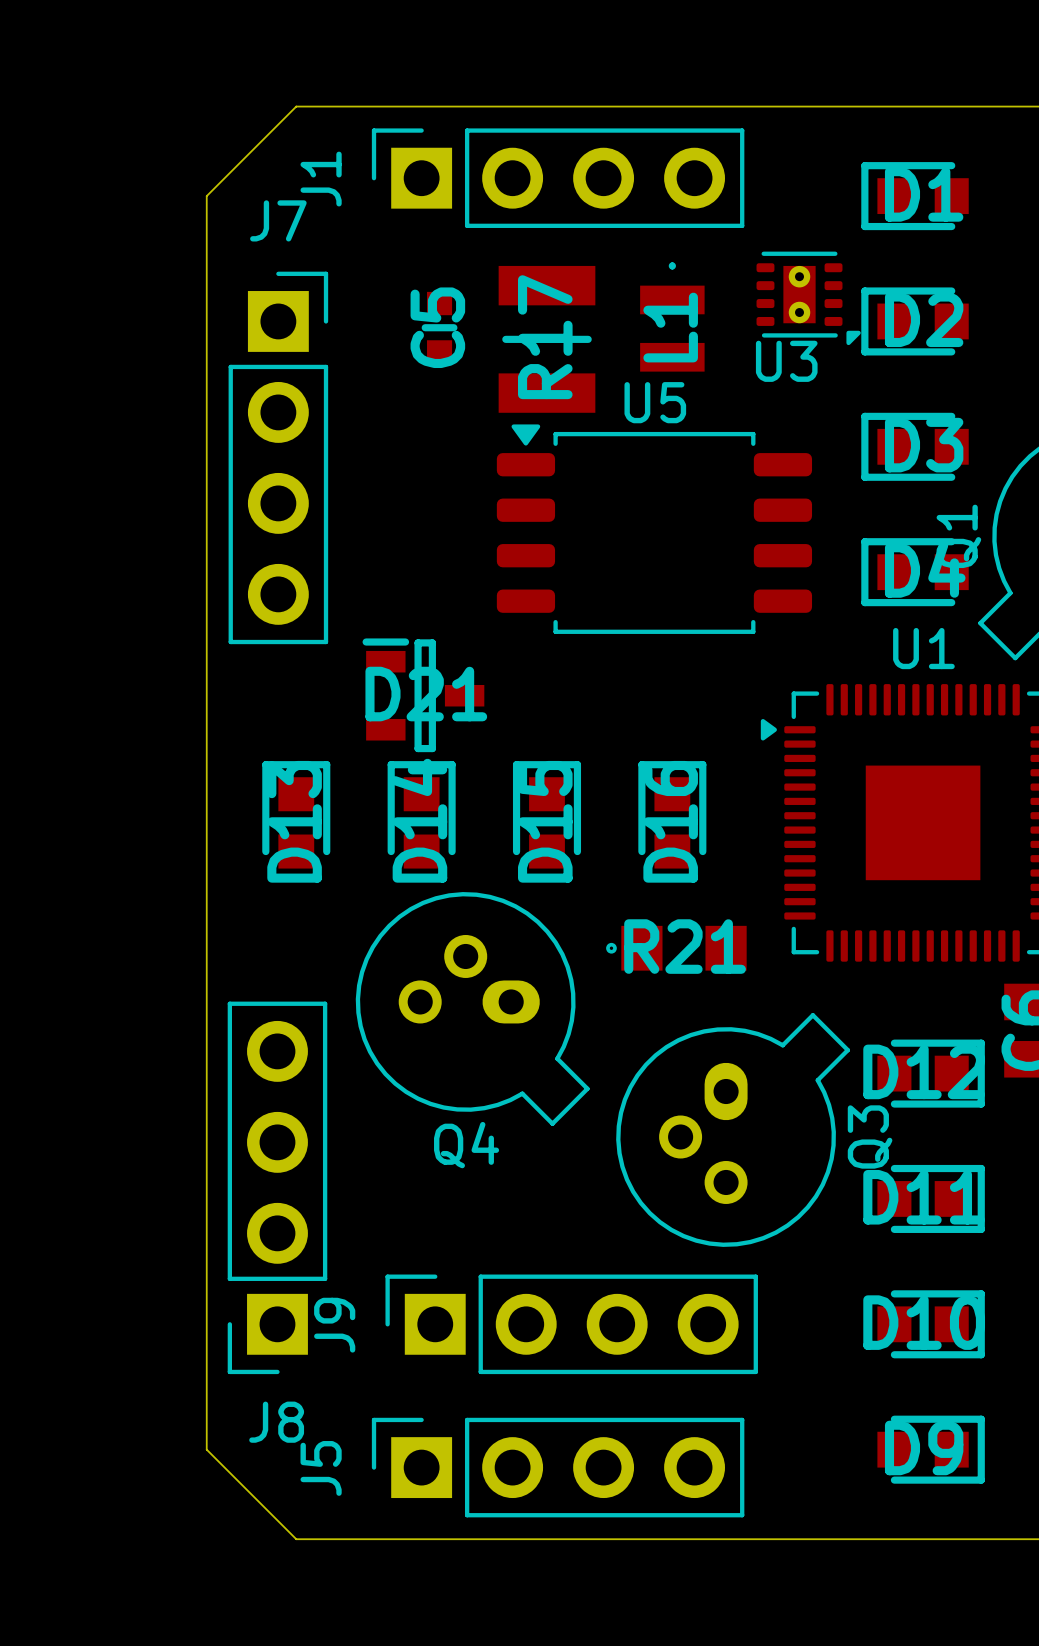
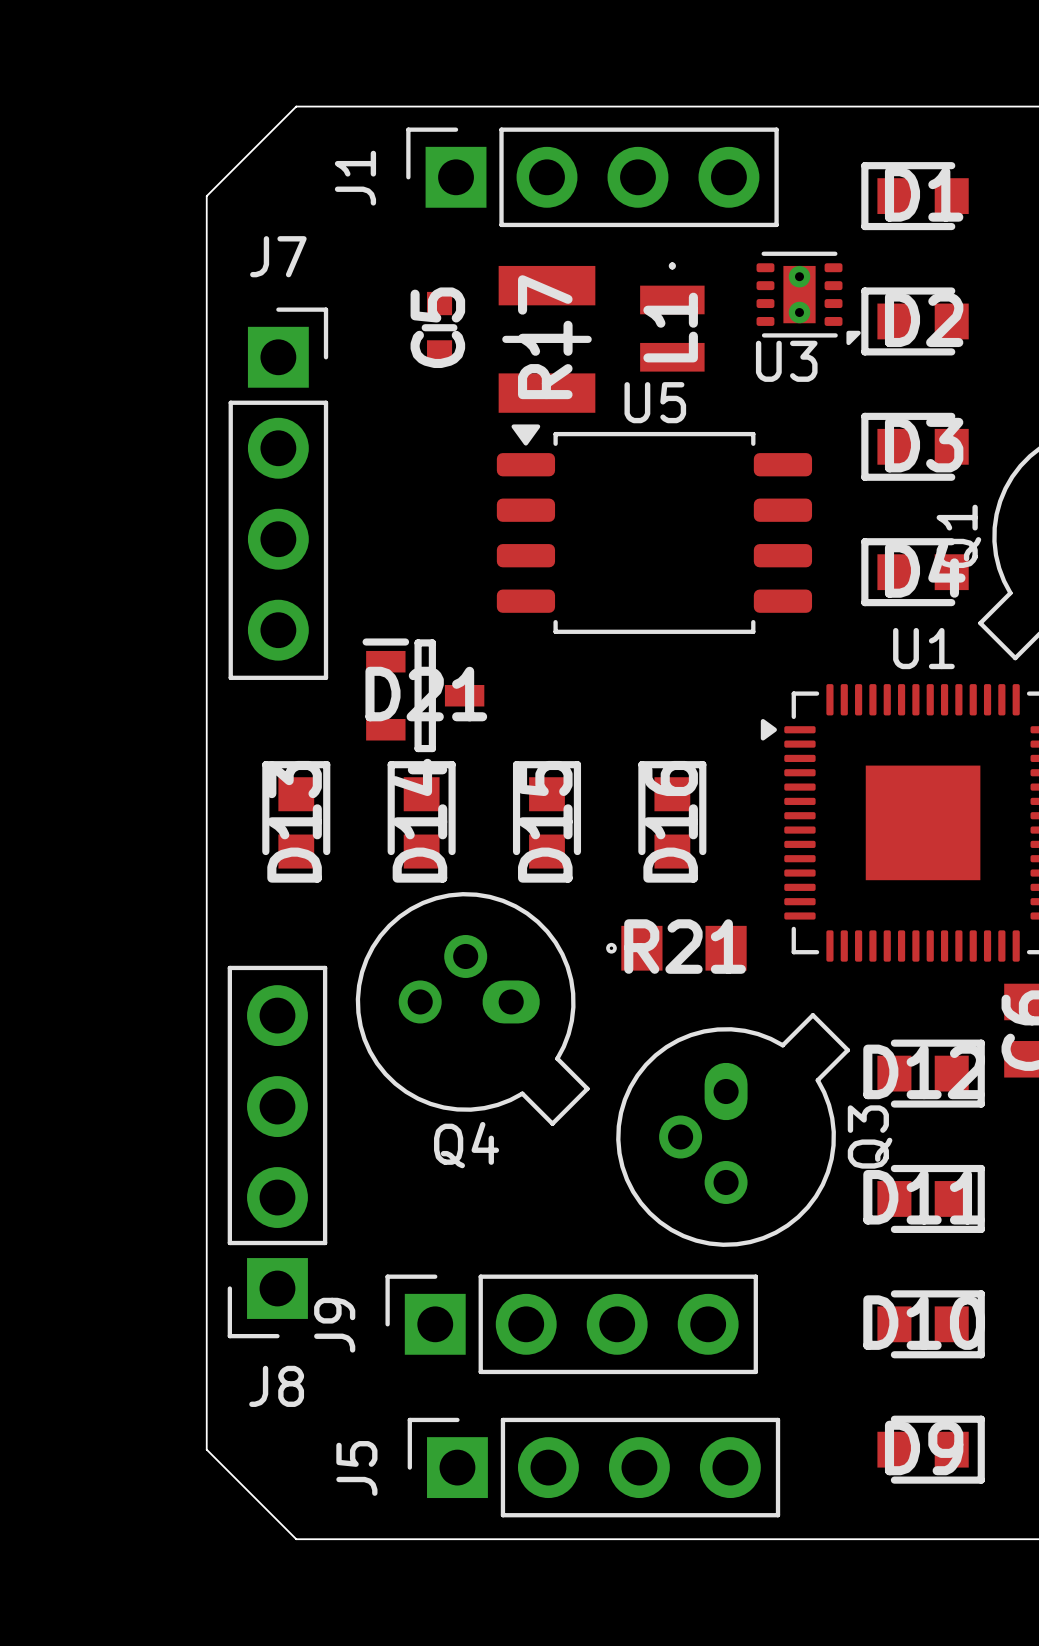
J1 position: (558, 178) -> (592, 177)
J7 position: (278, 457) -> (278, 493)
J8 position: (277, 1187) -> (277, 1152)
J5 position: (558, 1467) -> (593, 1467)

